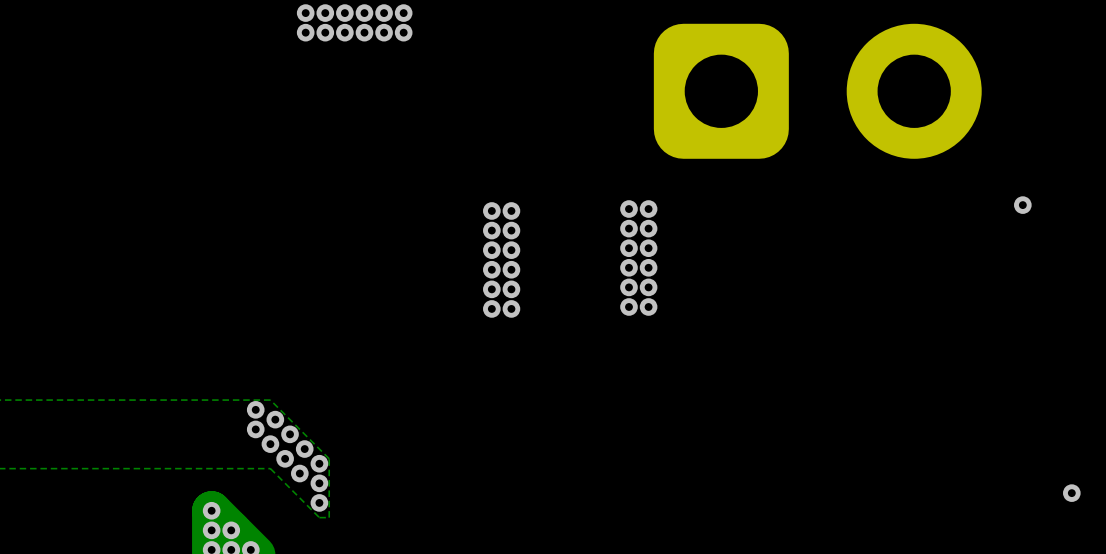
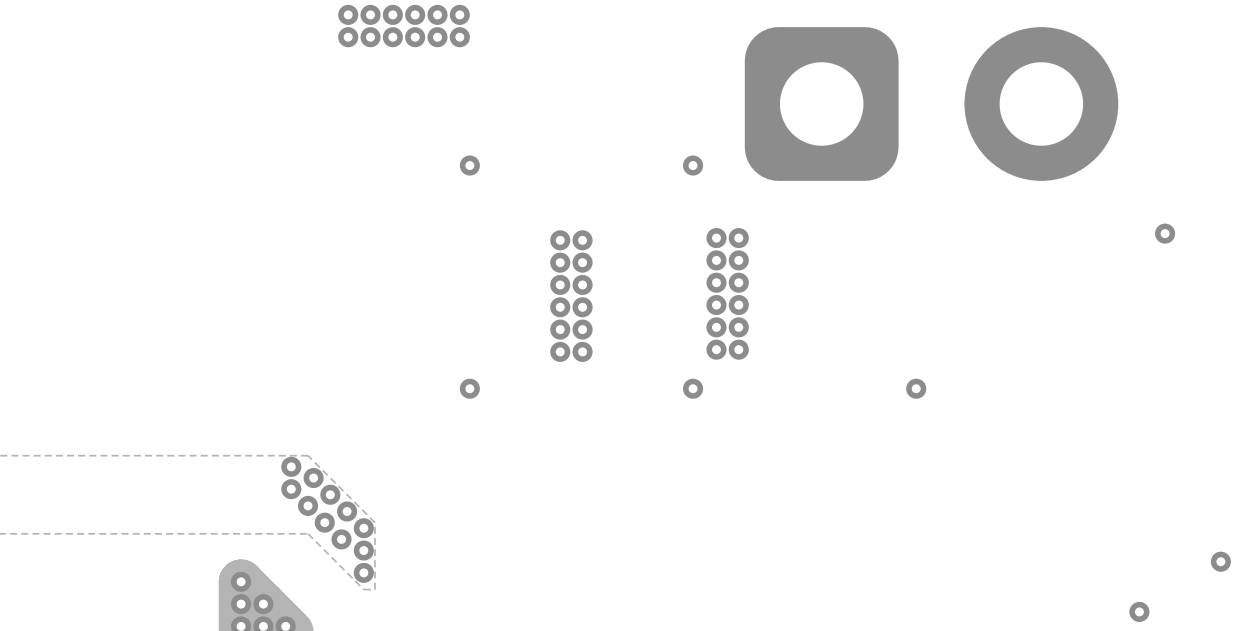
via: none -> (469, 165)
via: none -> (693, 165)
via: none -> (469, 388)
via: none -> (693, 388)
via: none -> (916, 388)
via: none -> (1139, 611)

